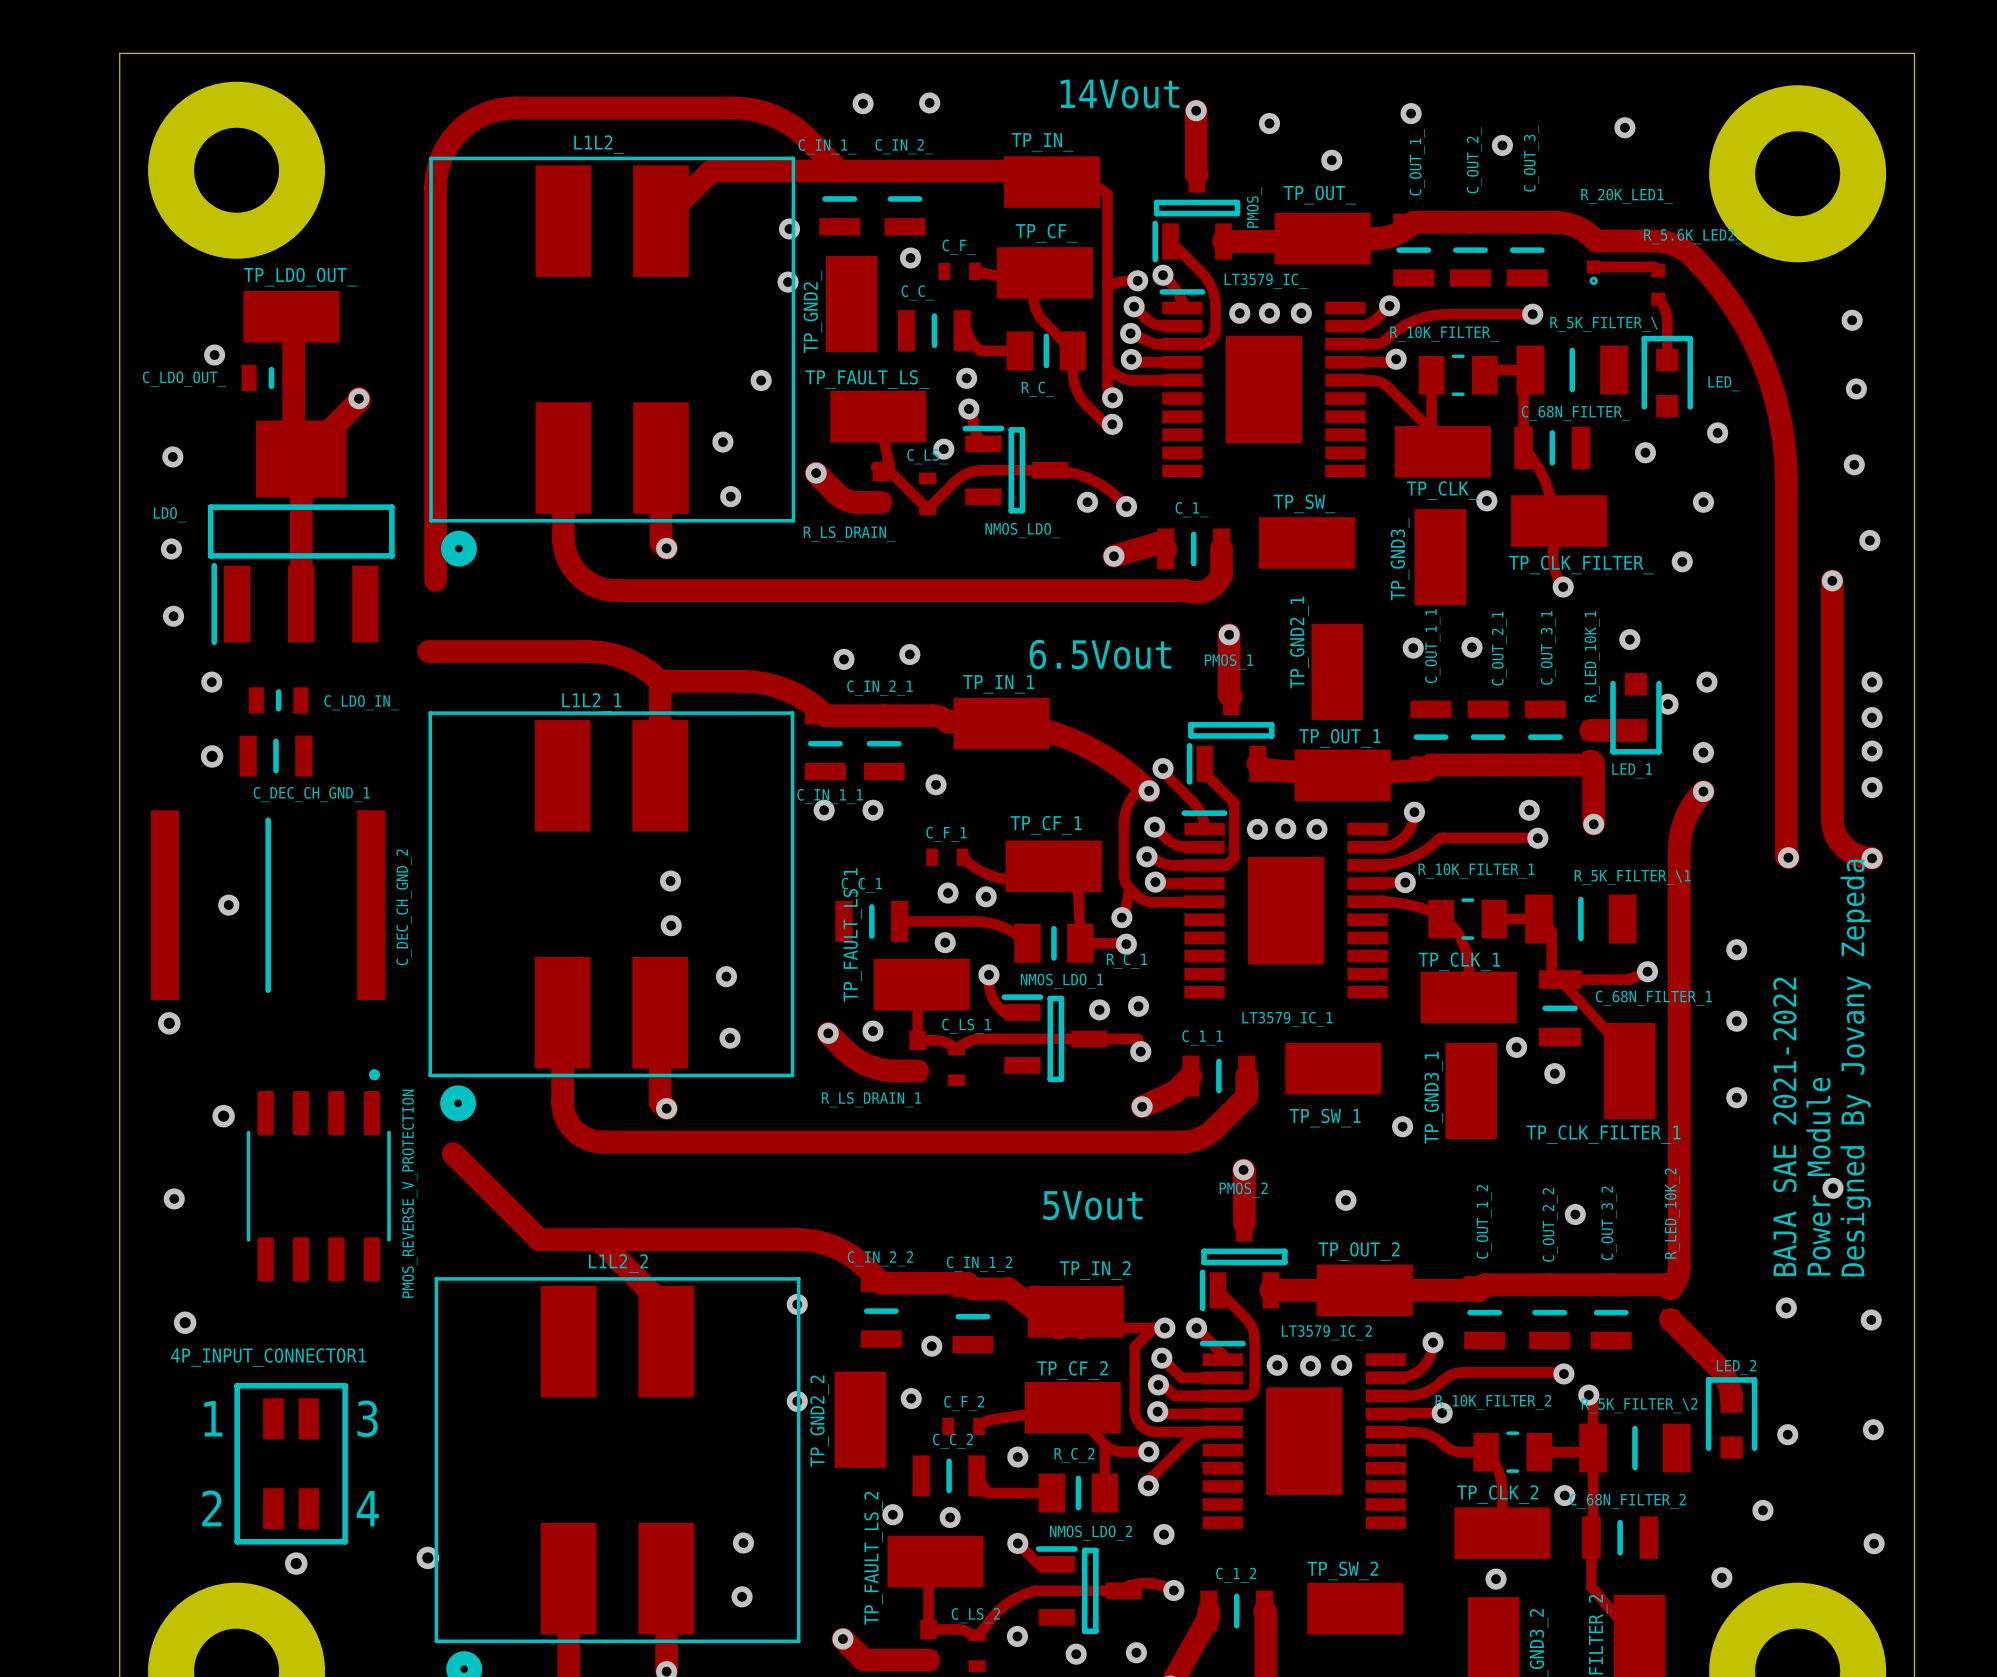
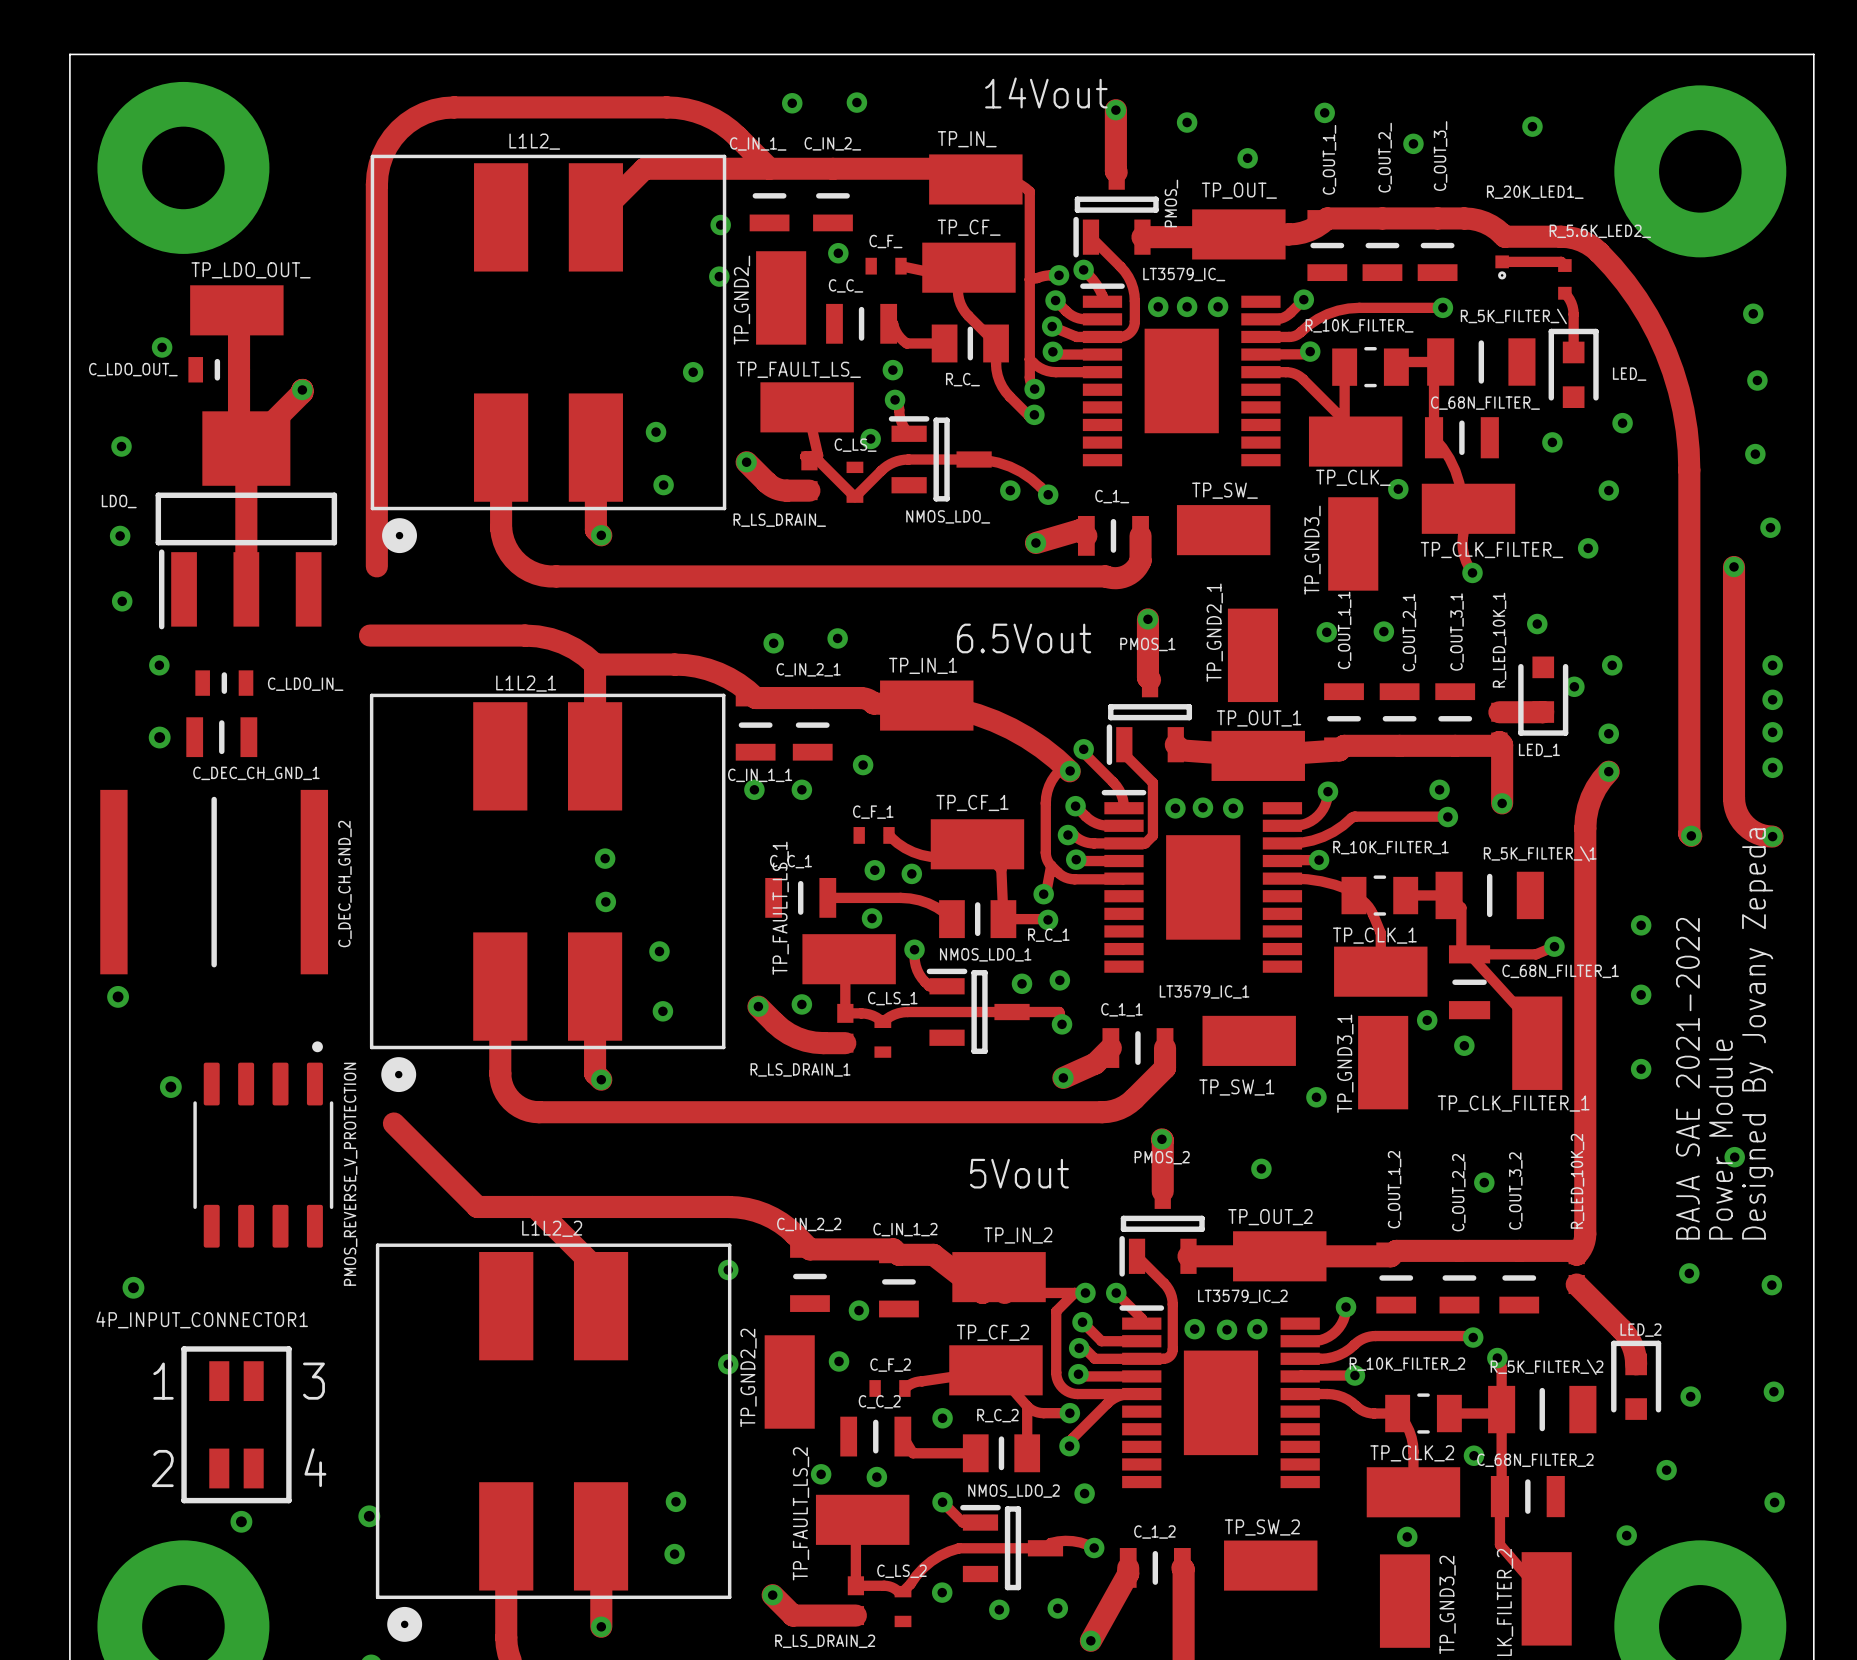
via: (228, 905) -> none
via: (174, 1198) -> none

